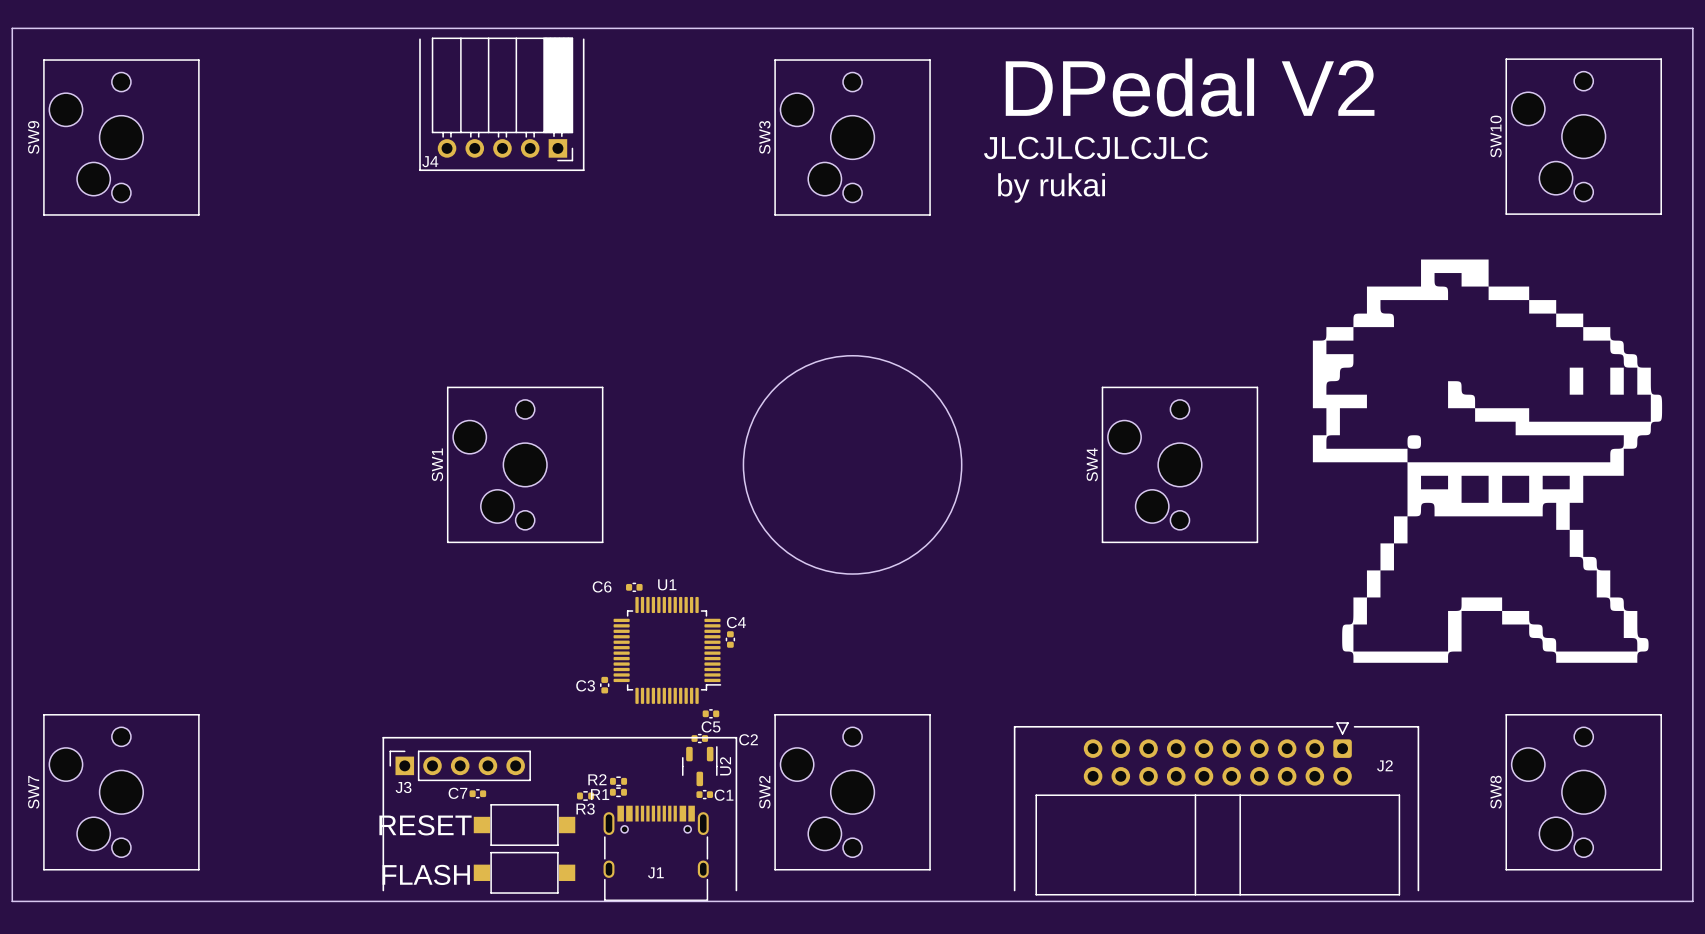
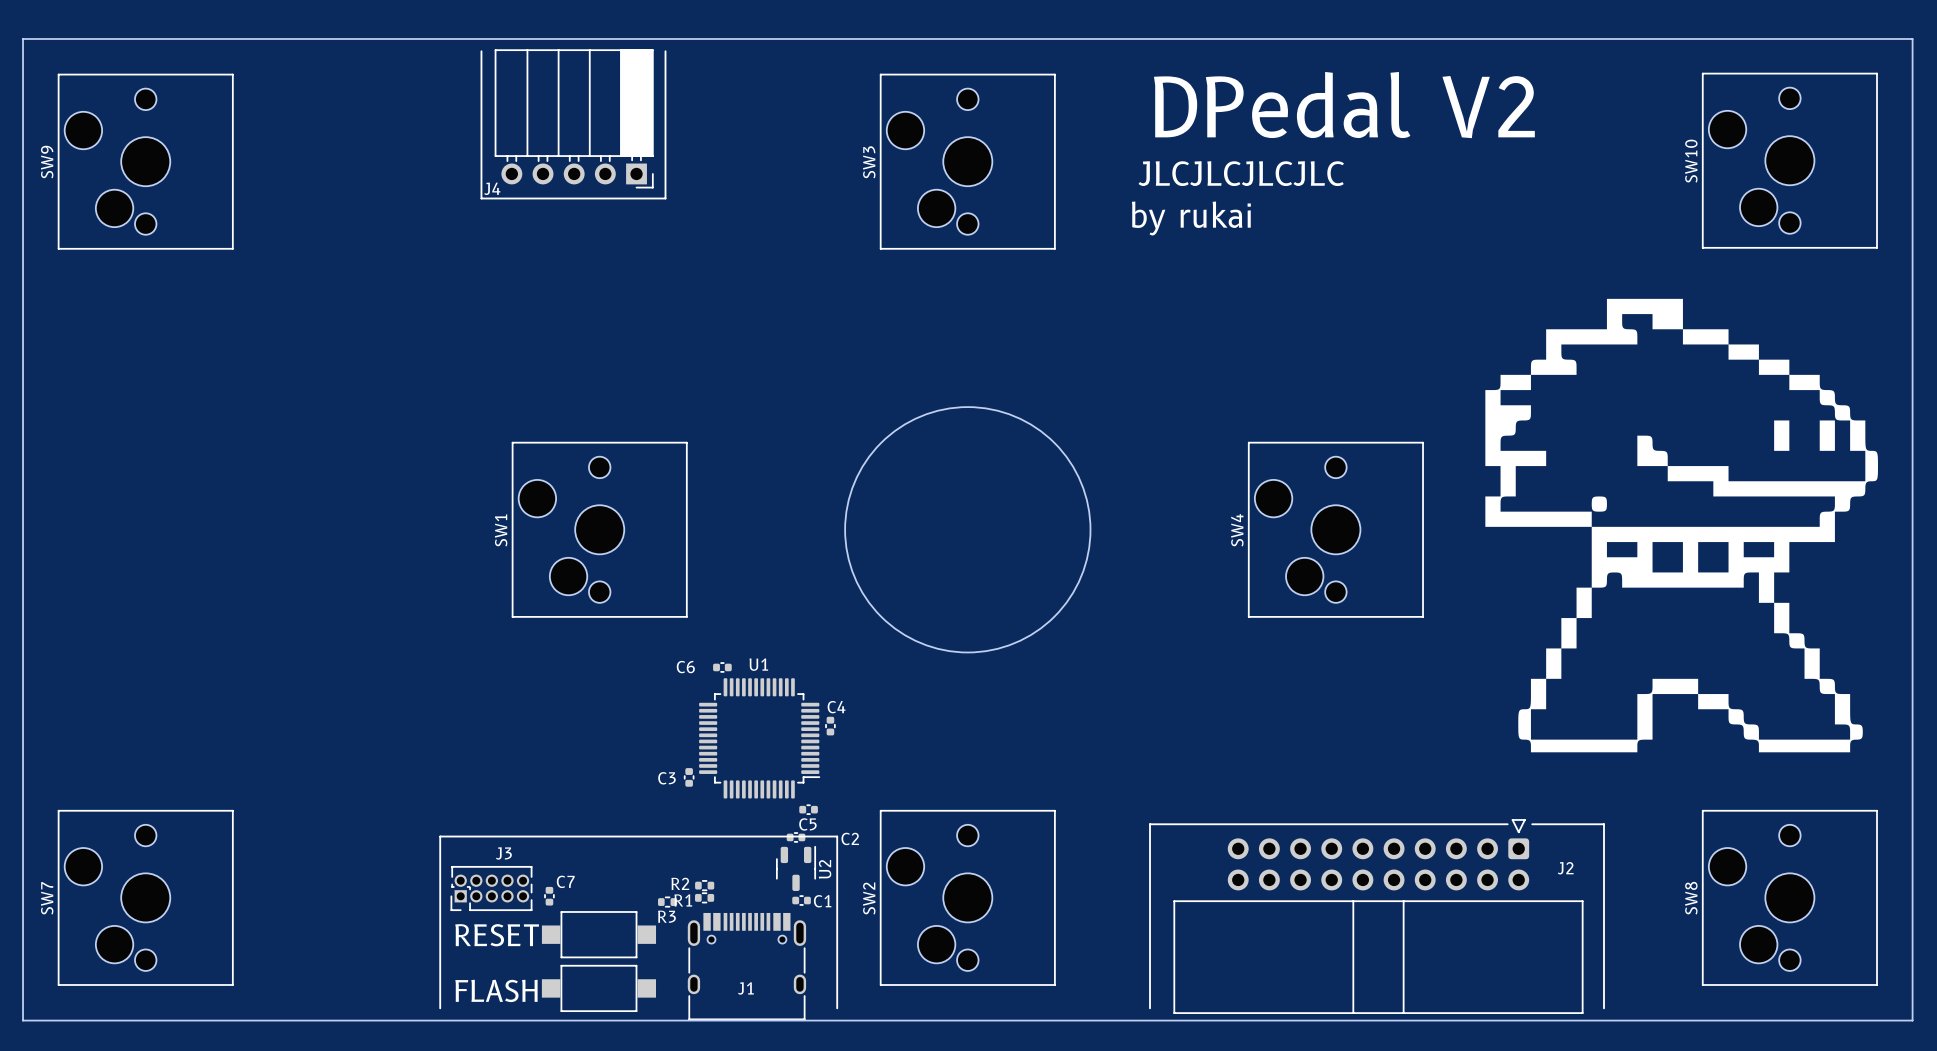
J3 footprint: [389, 750, 531, 782] -> [450, 866, 533, 911]
J3 name position: J3 (403, 787) -> J3 (503, 853)
C7 rotation: 0° (477, 793) -> 90° clockwise (549, 896)

